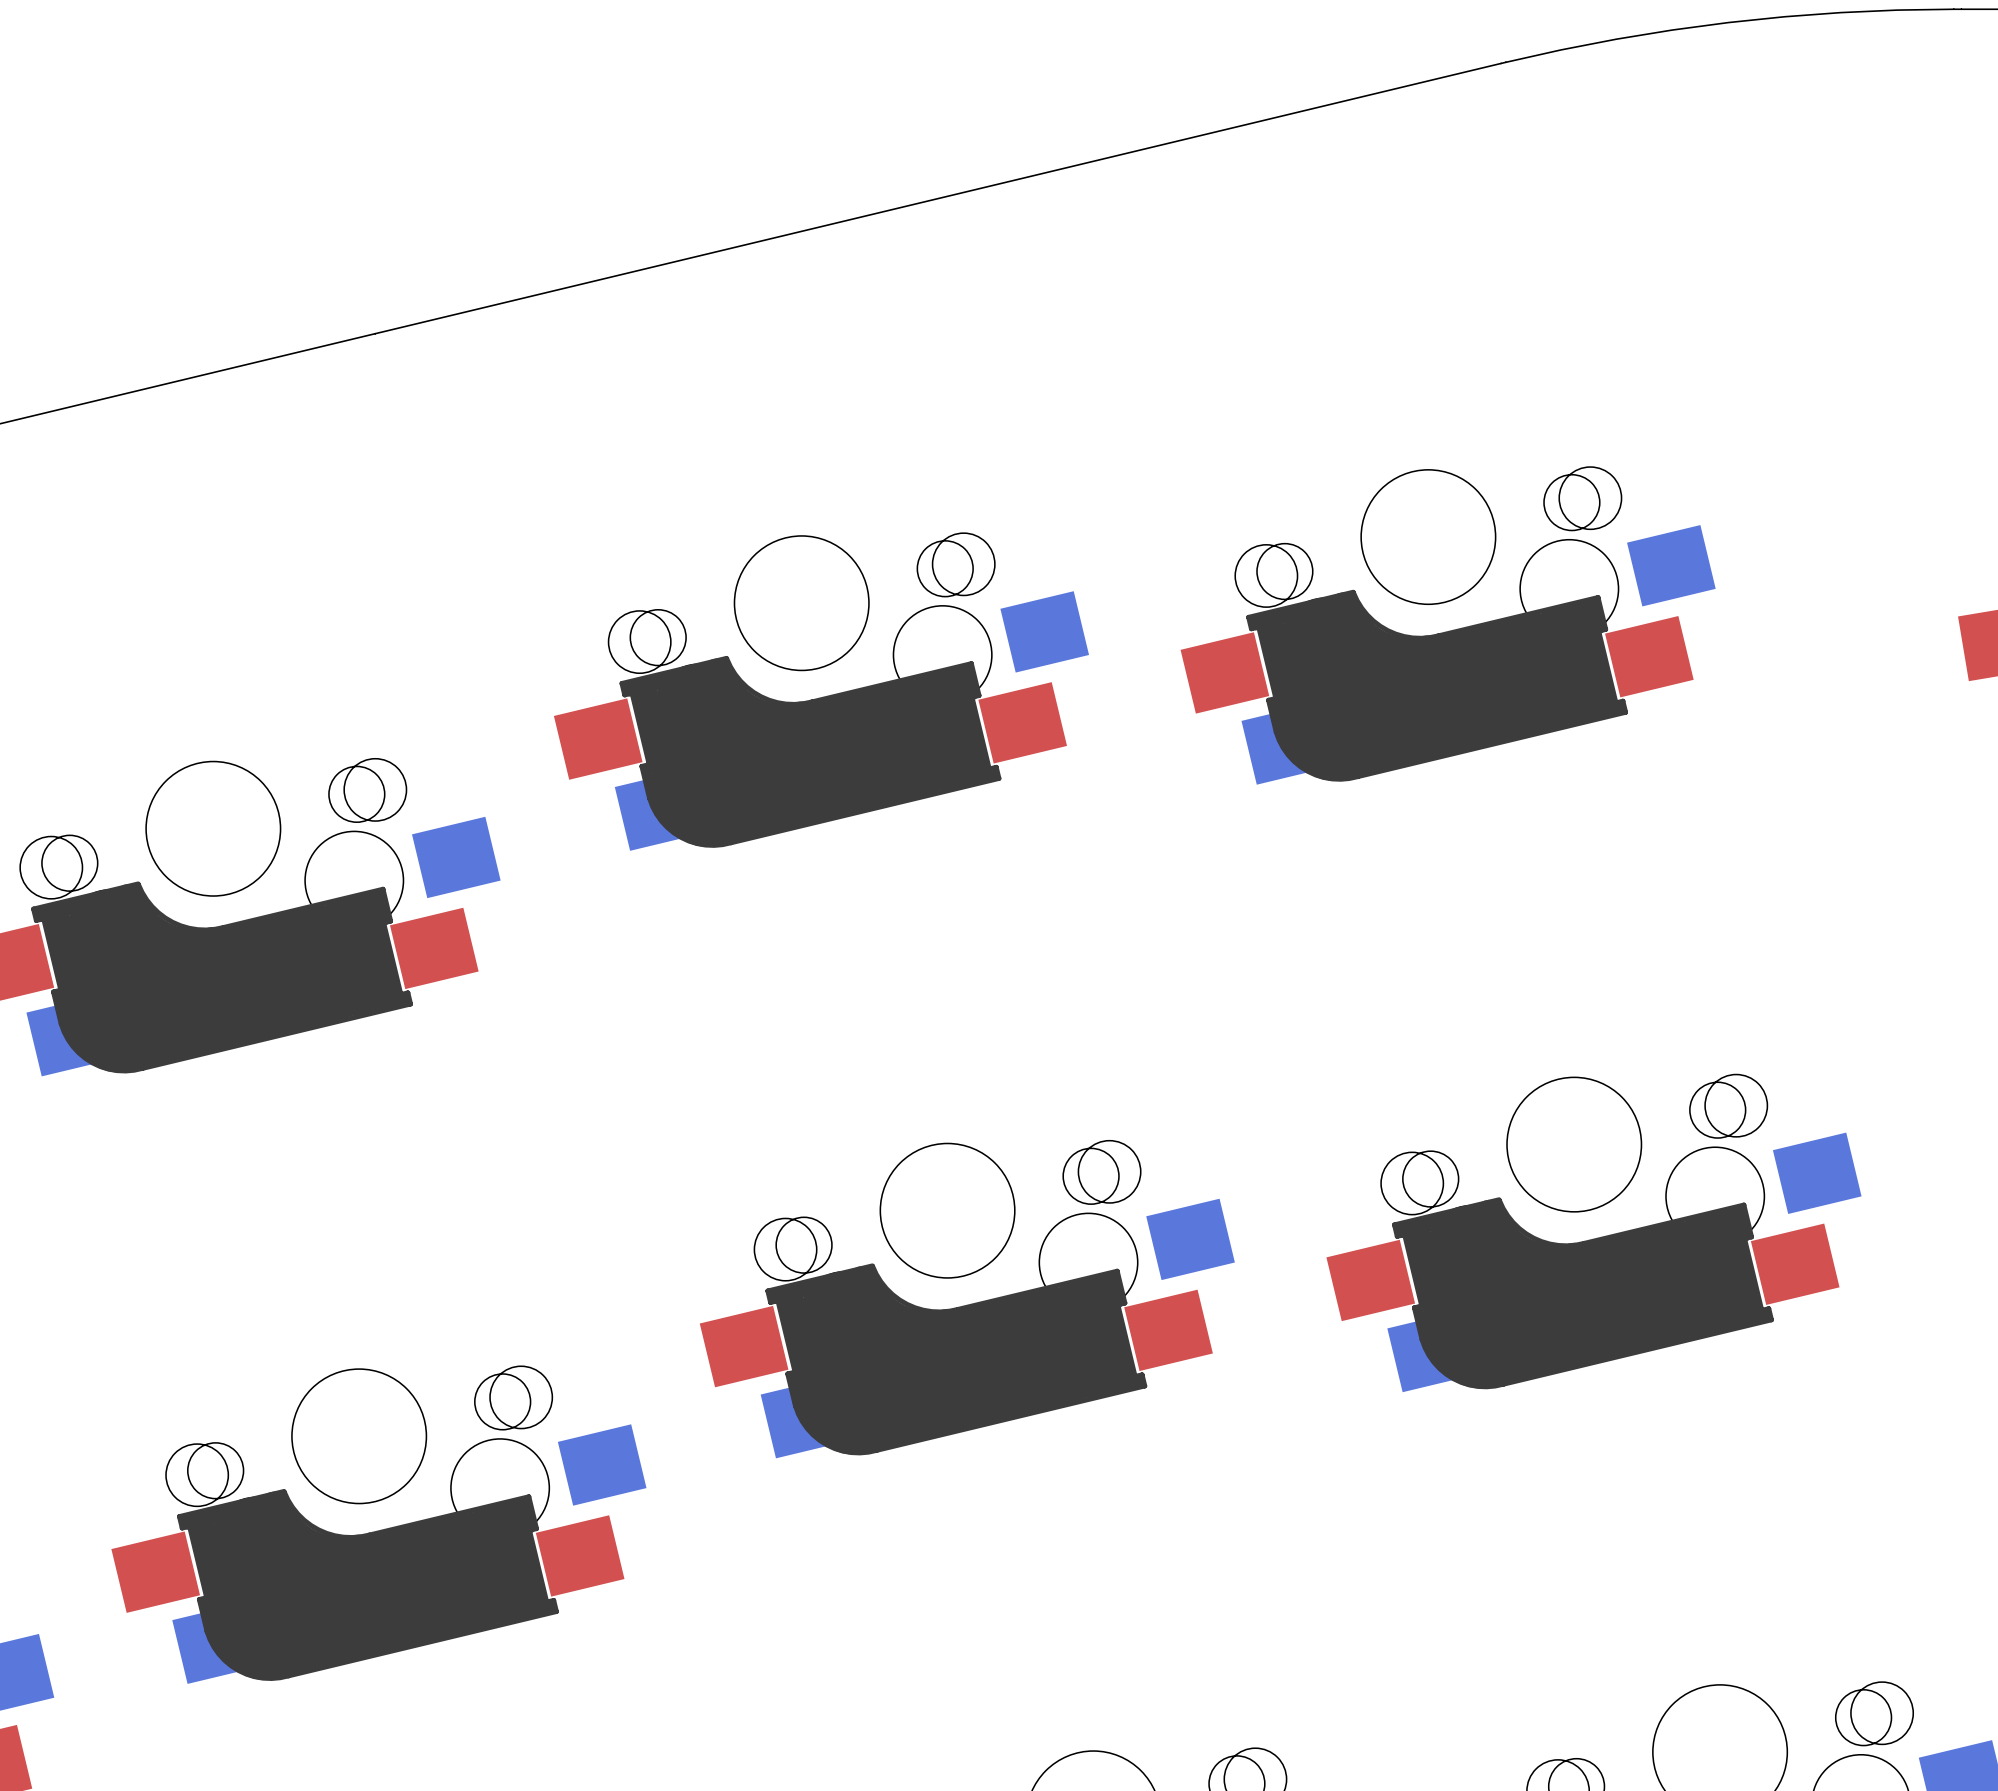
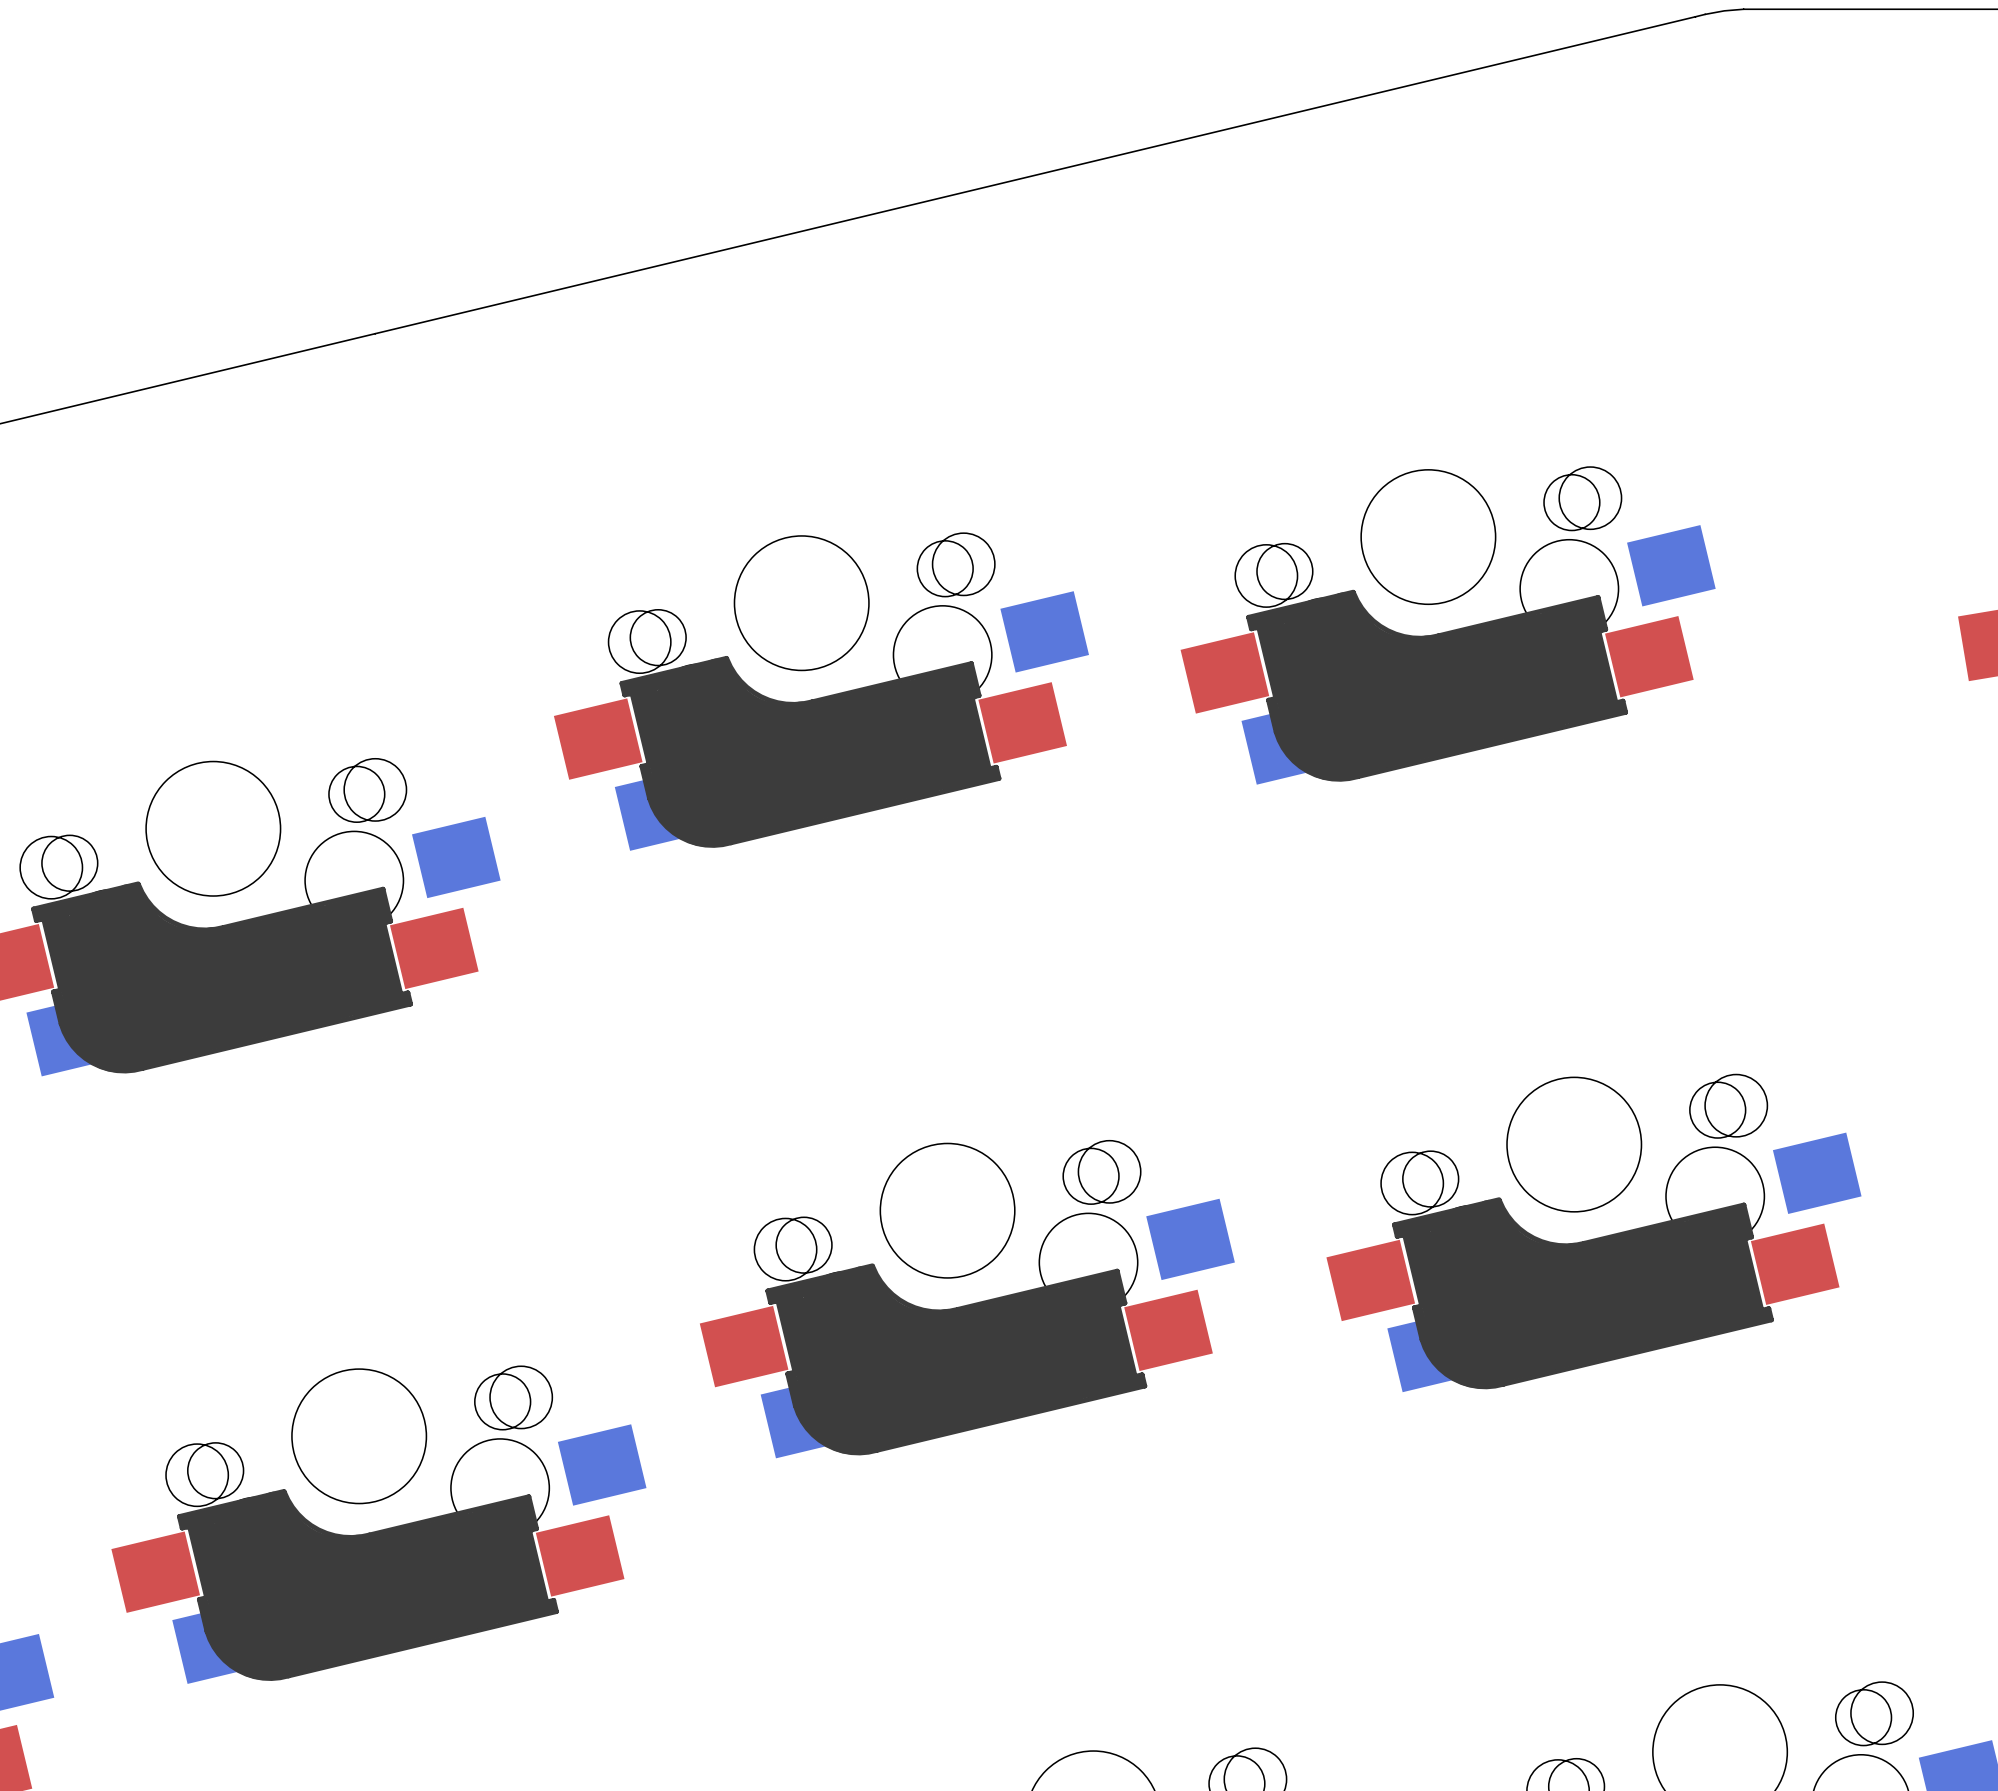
board edge: (1953, 9) (1840, 12) (1728, 22) (1616, 39) (1501, 63) -> (1953, 9) (1724, 10) (1501, 63)

